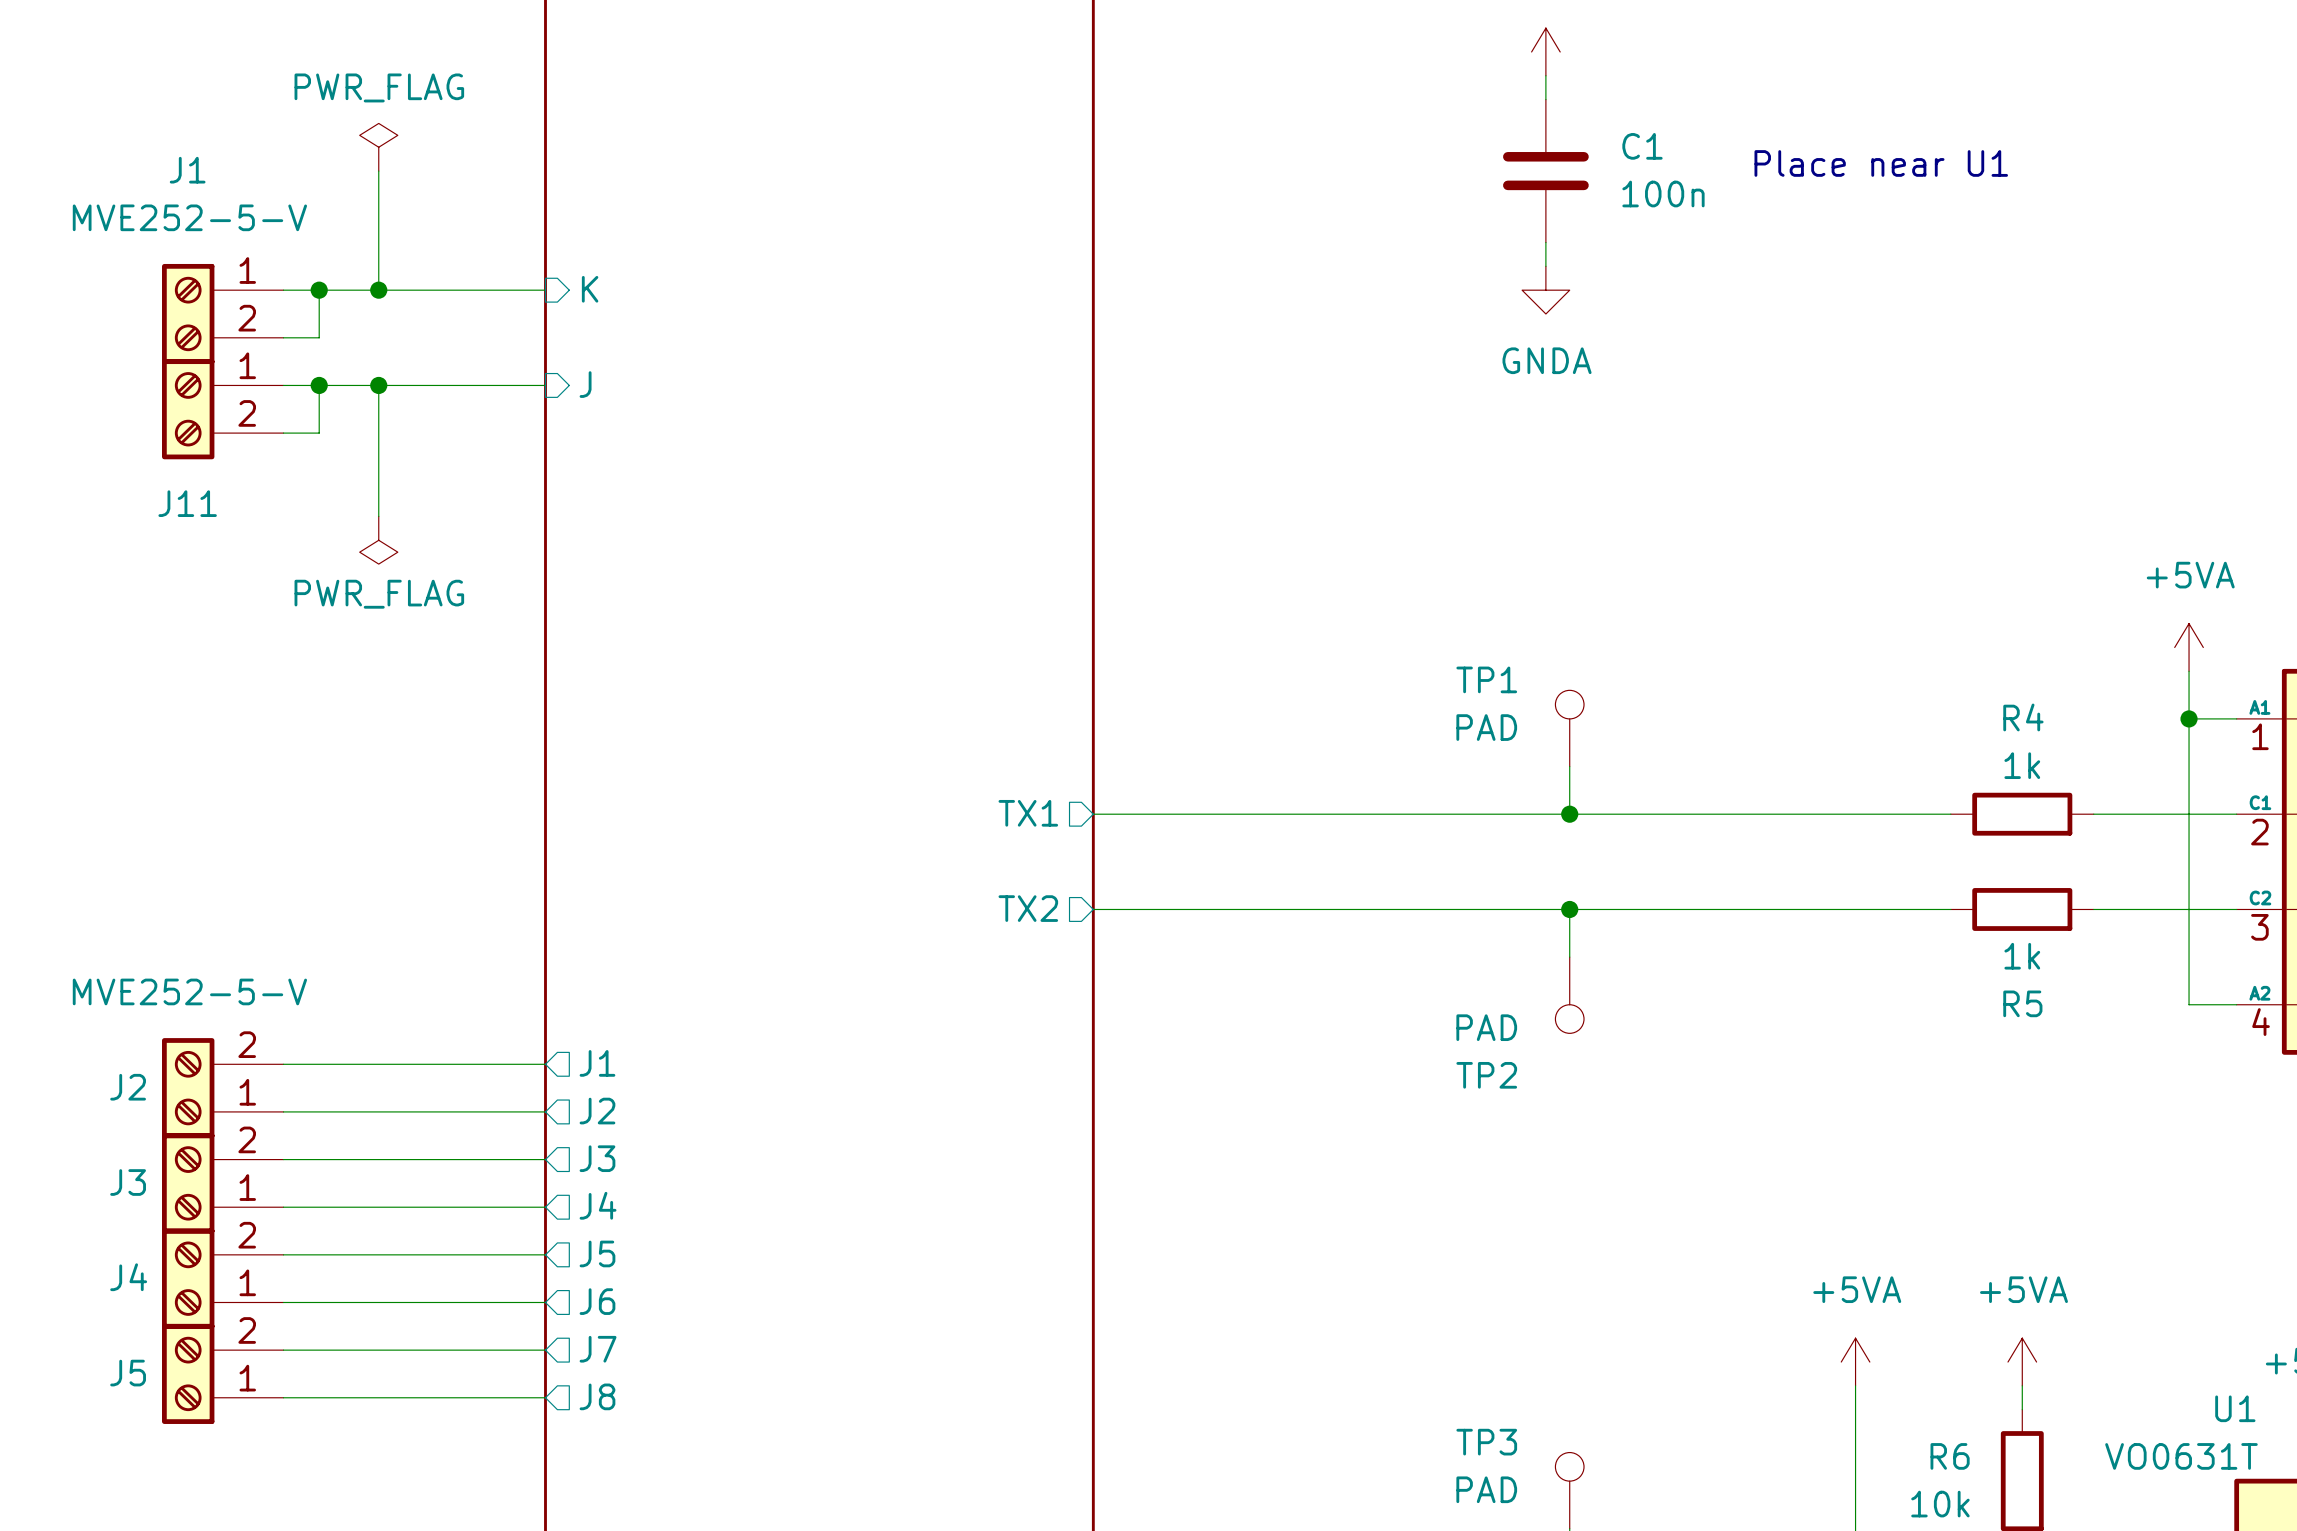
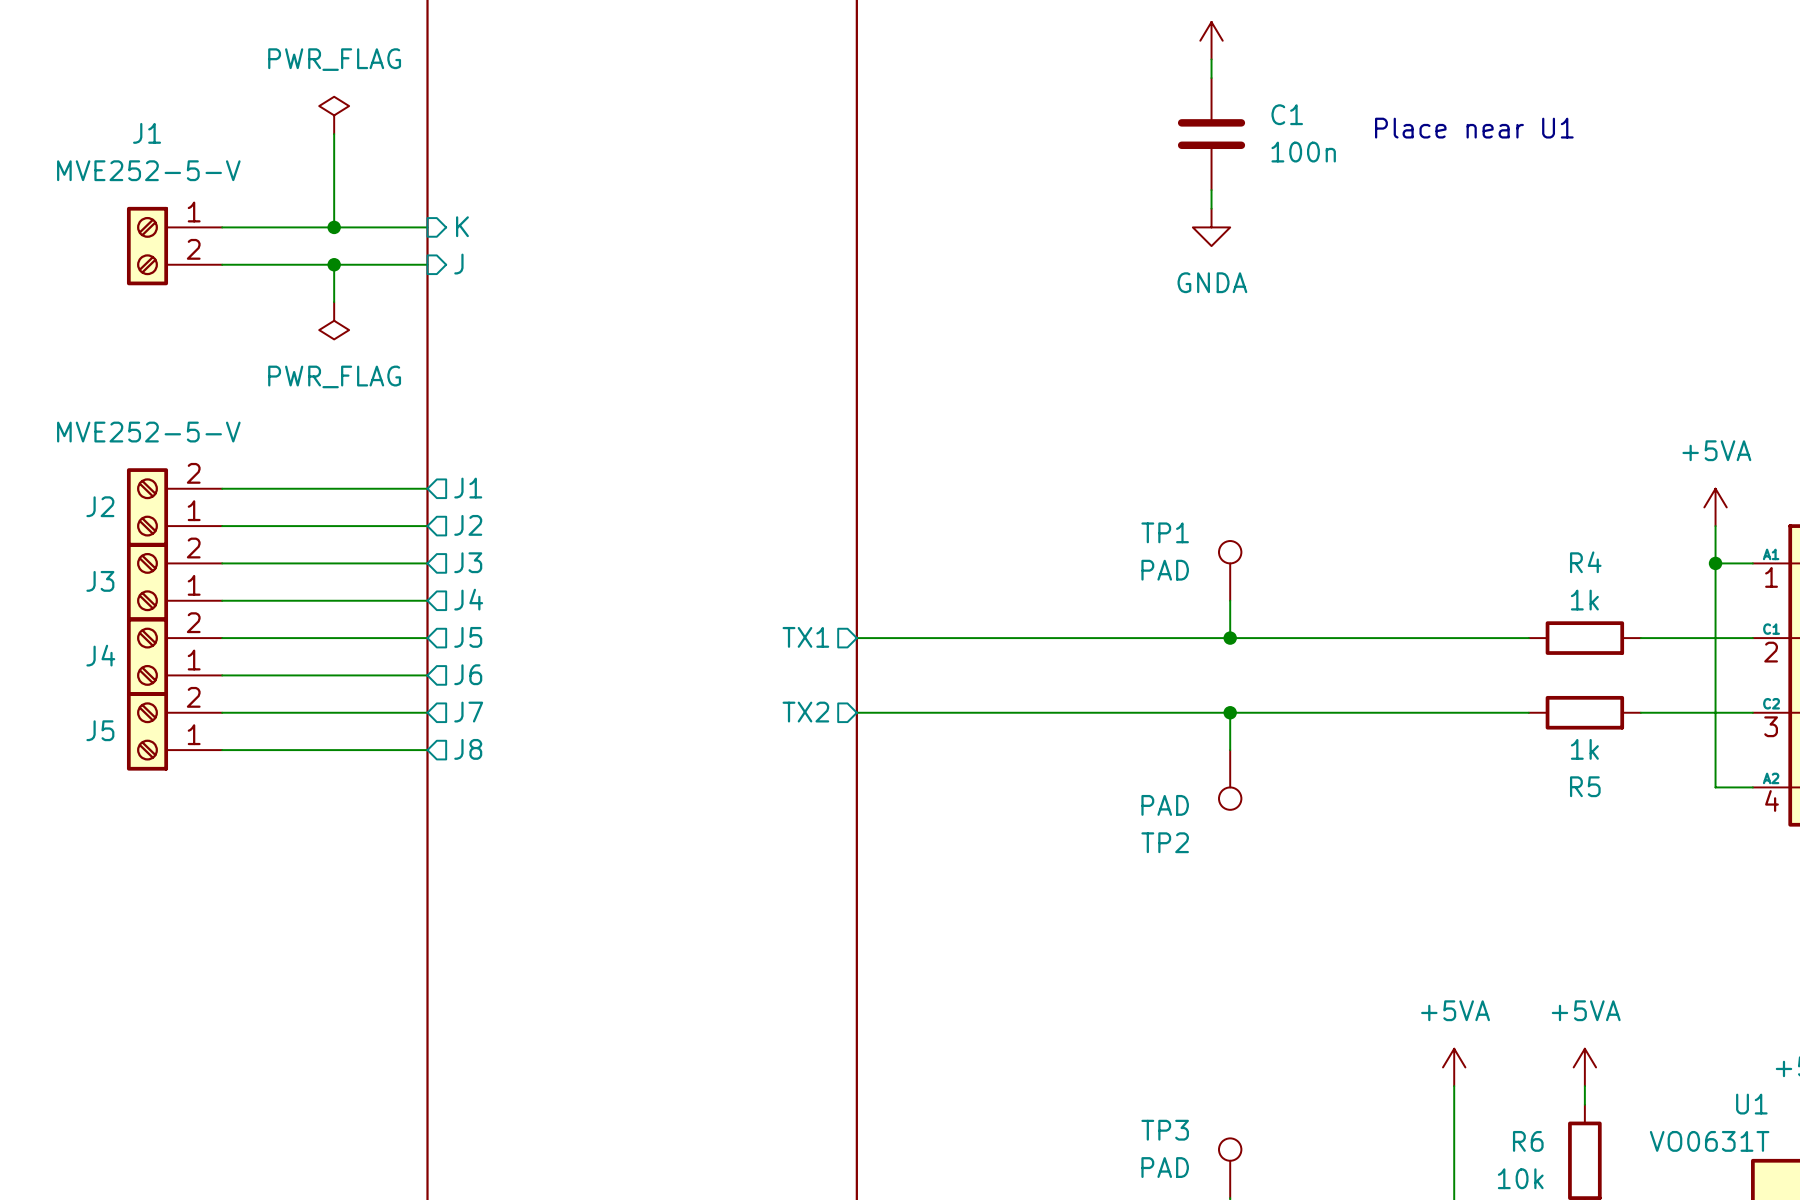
power symbol text position: PWR_FLAG (379, 87) -> PWR_FLAG (334, 59)
power symbol position: PWR_FLAG (378, 147) -> PWR_FLAG (334, 115)
wire: (378, 171) (378, 290) -> (334, 134) (334, 227)
wire: (319, 290) (319, 337) -> (427, 264) (250, 264)
junction: (319, 290) -> none
junction: (378, 290) -> none
junction: none -> (334, 227)
wire: none -> (334, 264) (334, 302)
junction: none -> (334, 264)
sheet pin position: J (585, 384) -> J (458, 264)
wire: (283, 385) (545, 385) -> none
wire: (319, 385) (319, 433) (283, 433) -> none
junction: (319, 385) -> none
wire: (378, 385) (378, 516) -> none
junction: (378, 385) -> none
J11: (222, 409) -> none
power symbol: none -> PWR_FLAG (334, 320)
power symbol: PWR_FLAG (378, 540) -> none
sheet pin position: J1 (597, 1063) -> J1 (468, 488)
wire: (283, 1064) (545, 1064) -> (222, 488) (427, 488)
J2 position: (222, 1088) -> (174, 507)
wire: (283, 1111) (545, 1111) -> (222, 526) (427, 526)
sheet pin position: J2 (597, 1111) -> J2 (468, 525)
sheet pin position: J3 (597, 1158) -> J3 (468, 562)
wire: (283, 1159) (545, 1159) -> (222, 563) (427, 563)
J3 position: (222, 1183) -> (174, 582)
sheet pin position: J4 (598, 1205) -> J4 (468, 599)
wire: (283, 1207) (545, 1207) -> (222, 600) (427, 600)
sheet pin position: J5 (597, 1253) -> J5 (468, 637)
wire: (283, 1254) (545, 1254) -> (222, 638) (427, 638)
J4 position: (222, 1278) -> (174, 656)
sheet pin position: J6 (597, 1301) -> J6 (468, 674)
wire: (283, 1302) (545, 1302) -> (222, 675) (427, 675)
sheet pin position: J7 (598, 1349) -> J7 (468, 712)
wire: (283, 1350) (545, 1350) -> (222, 712) (427, 712)
J5 position: (222, 1373) -> (174, 731)
sheet pin position: J8 (597, 1396) -> J8 (468, 749)
wire: (283, 1397) (545, 1397) -> (222, 750) (427, 750)

